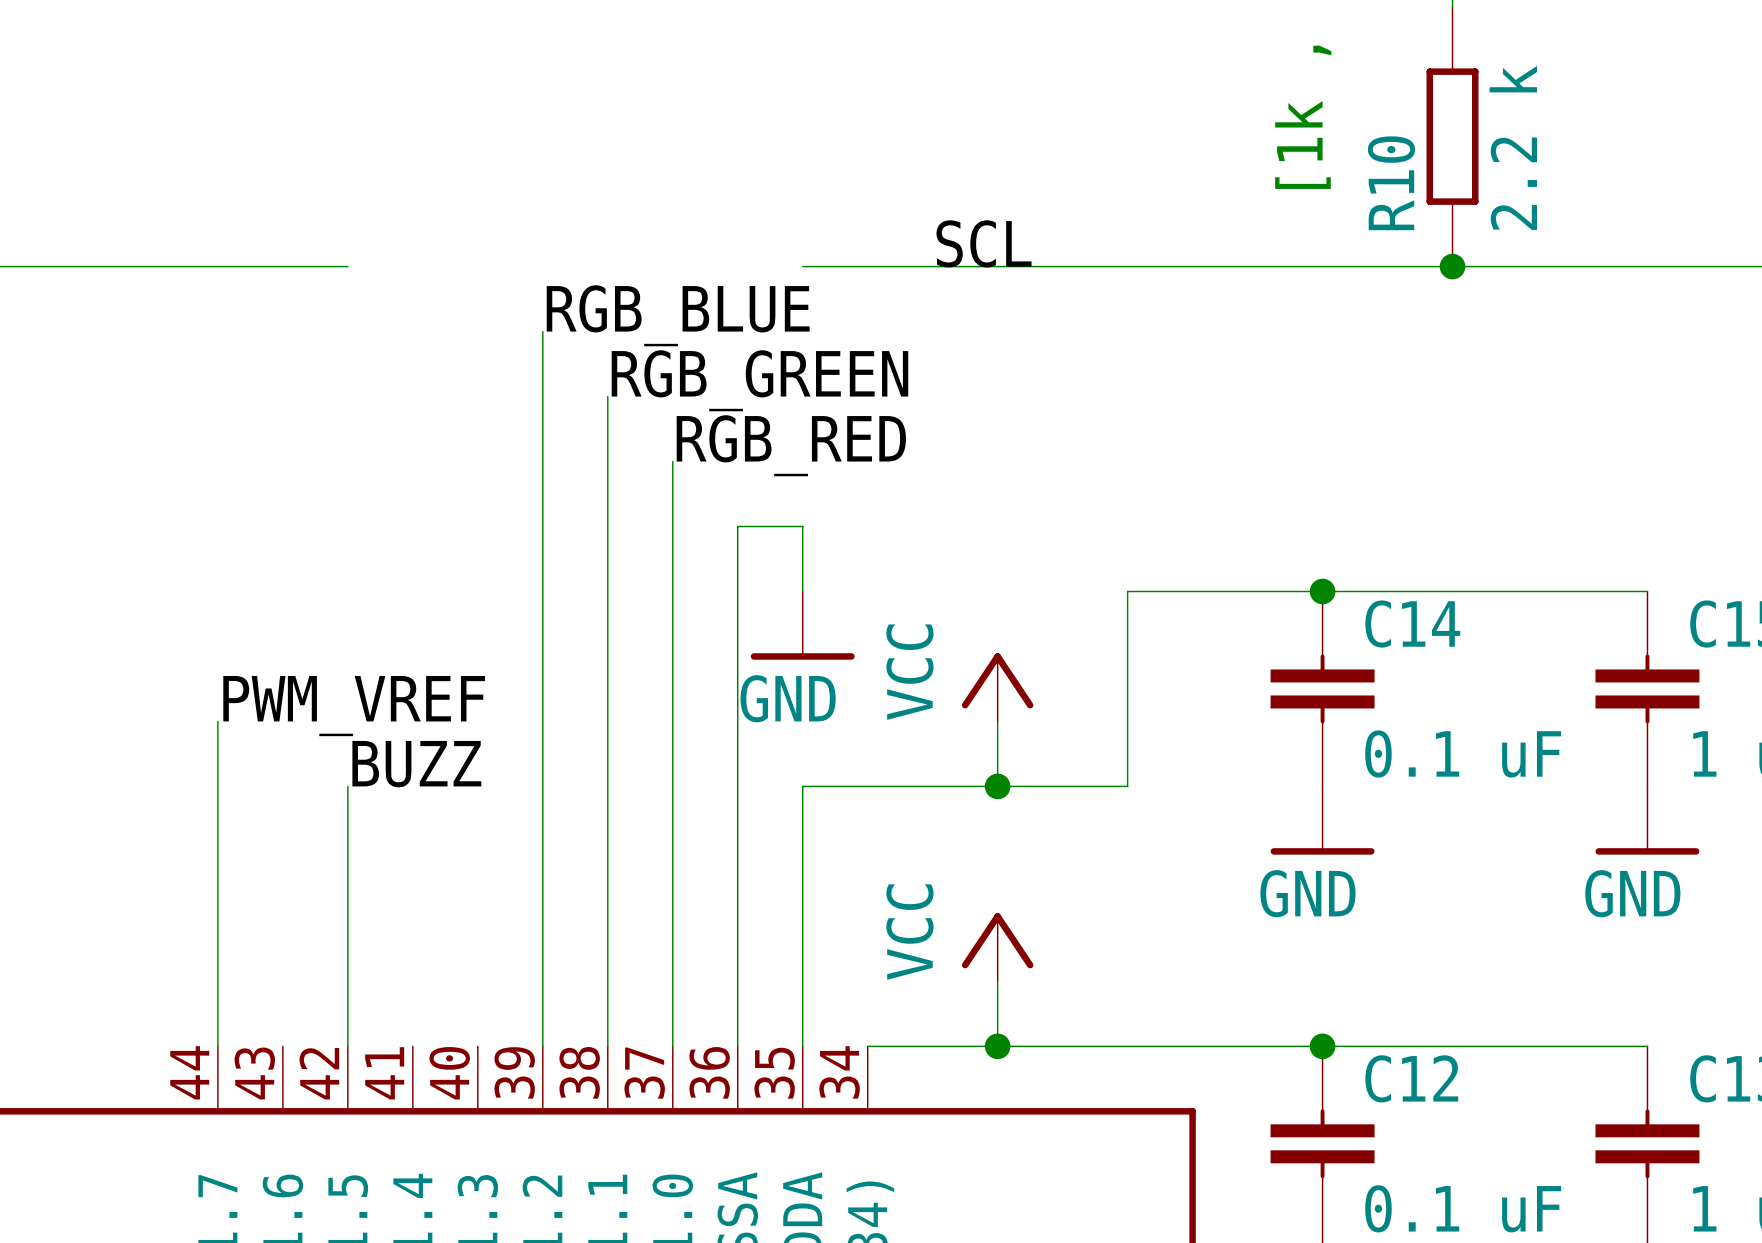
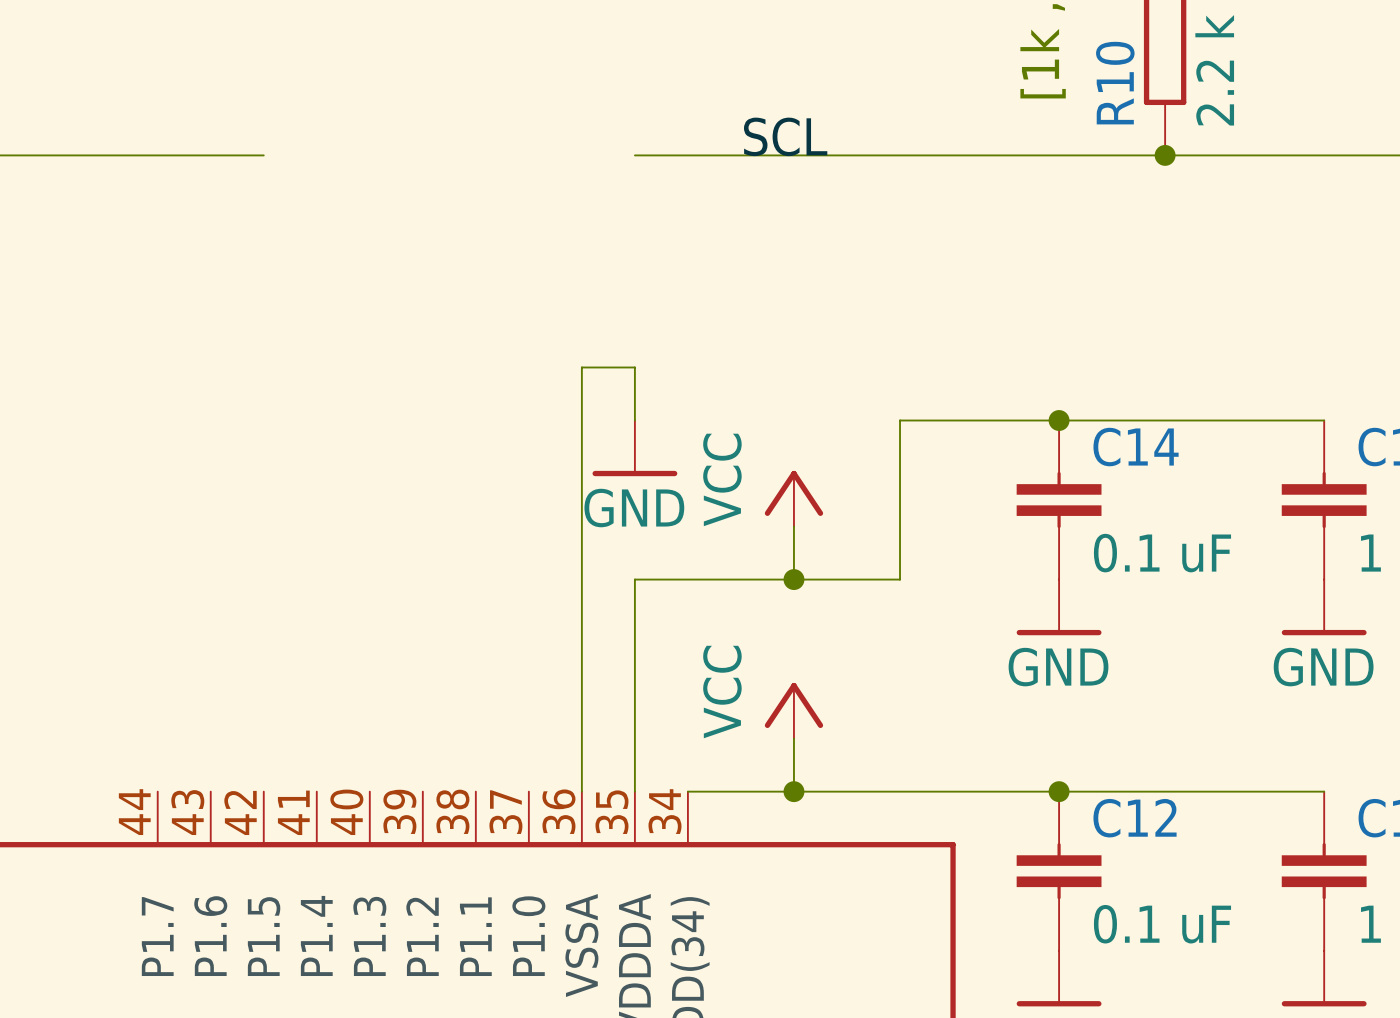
label: RGB_BLUE (678, 315) -> none
wire: (542, 331) (542, 1046) -> none
label: RGB_GREEN (759, 380) -> none
wire: (607, 396) (607, 1046) -> none
label: RGB_RED (791, 445) -> none
wire: (672, 461) (672, 1046) -> none
label: PWM_VREF (354, 706) -> none
wire: (217, 721) (217, 1046) -> none
label: BUZZ (416, 764) -> none
wire: (347, 786) (347, 1046) -> none

